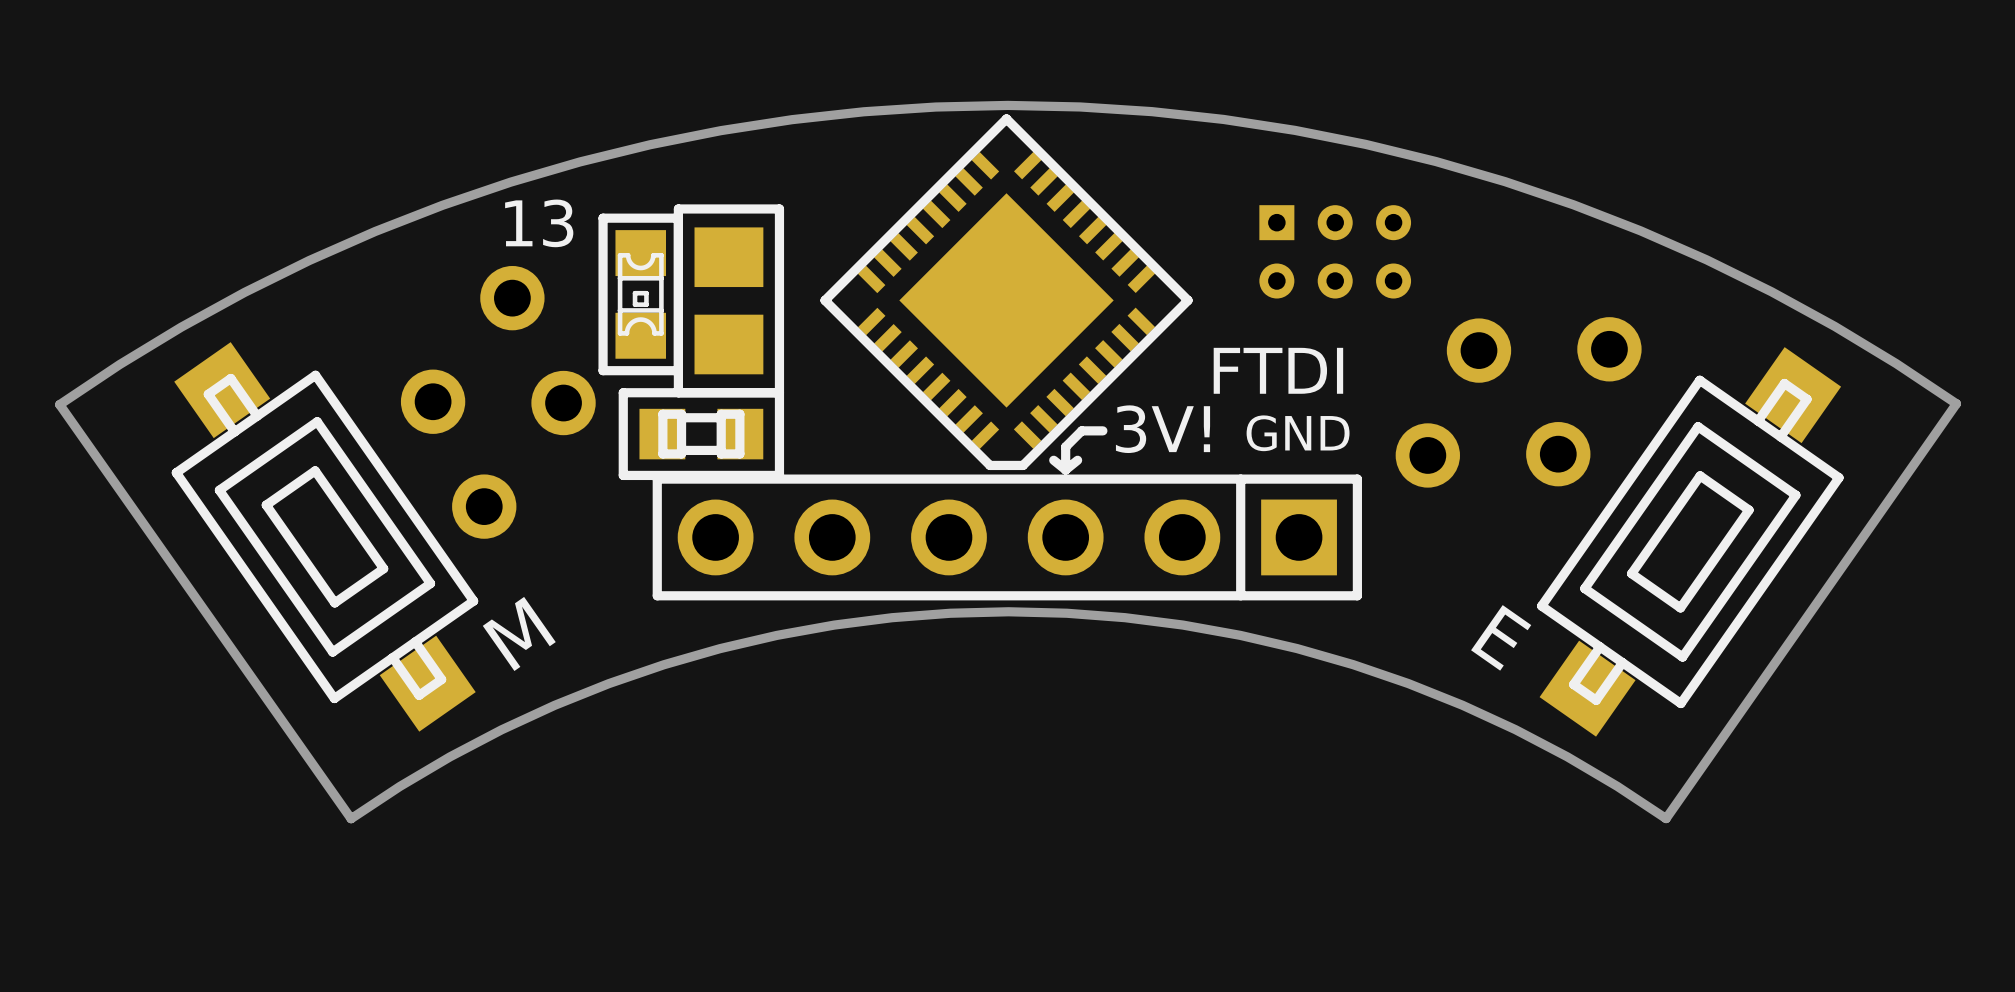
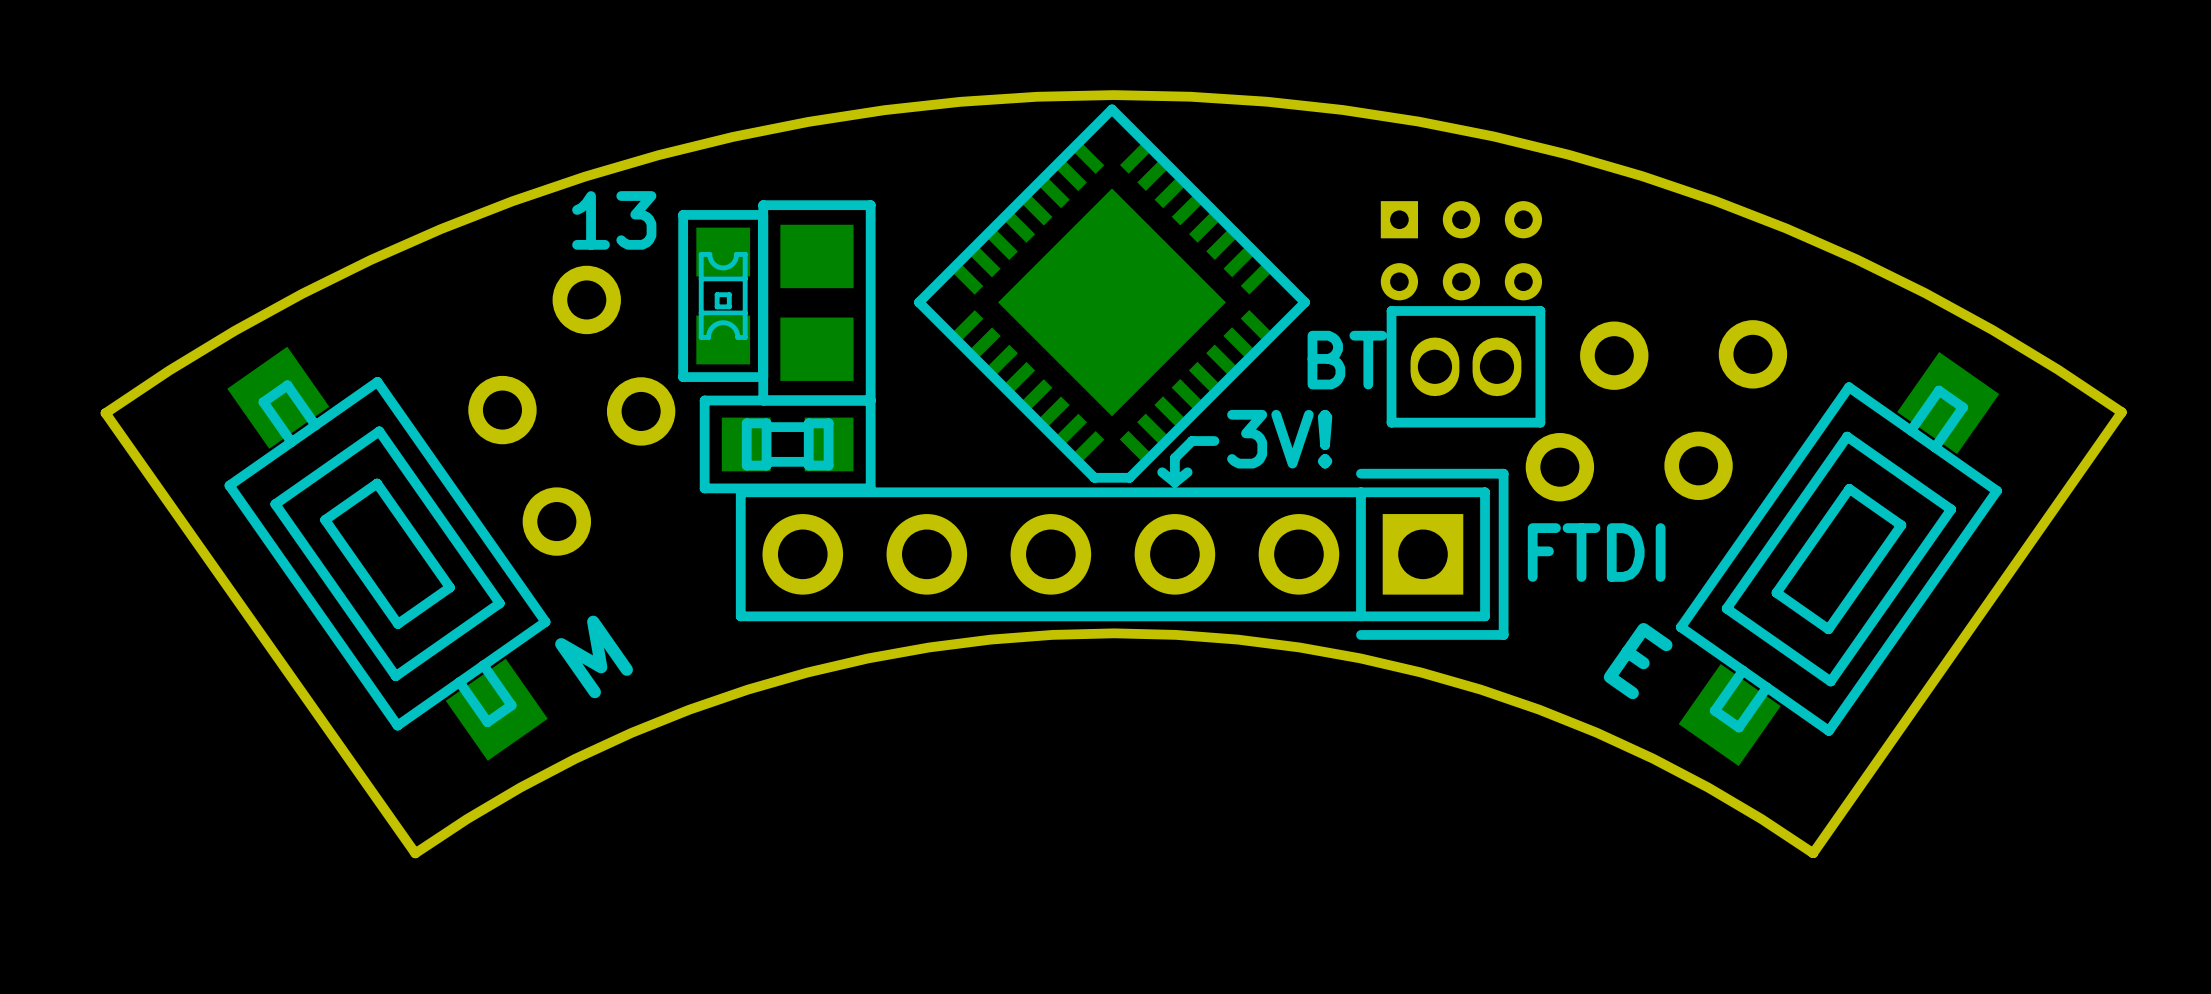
text: none -> BT (1347, 360)
part: none -> (1465, 366)
part value position: FTDI (1278, 370) -> FTDI (1596, 552)
text: GND (1298, 433) -> none
part footprint: [652, 474, 1362, 601] -> [735, 468, 1509, 640]

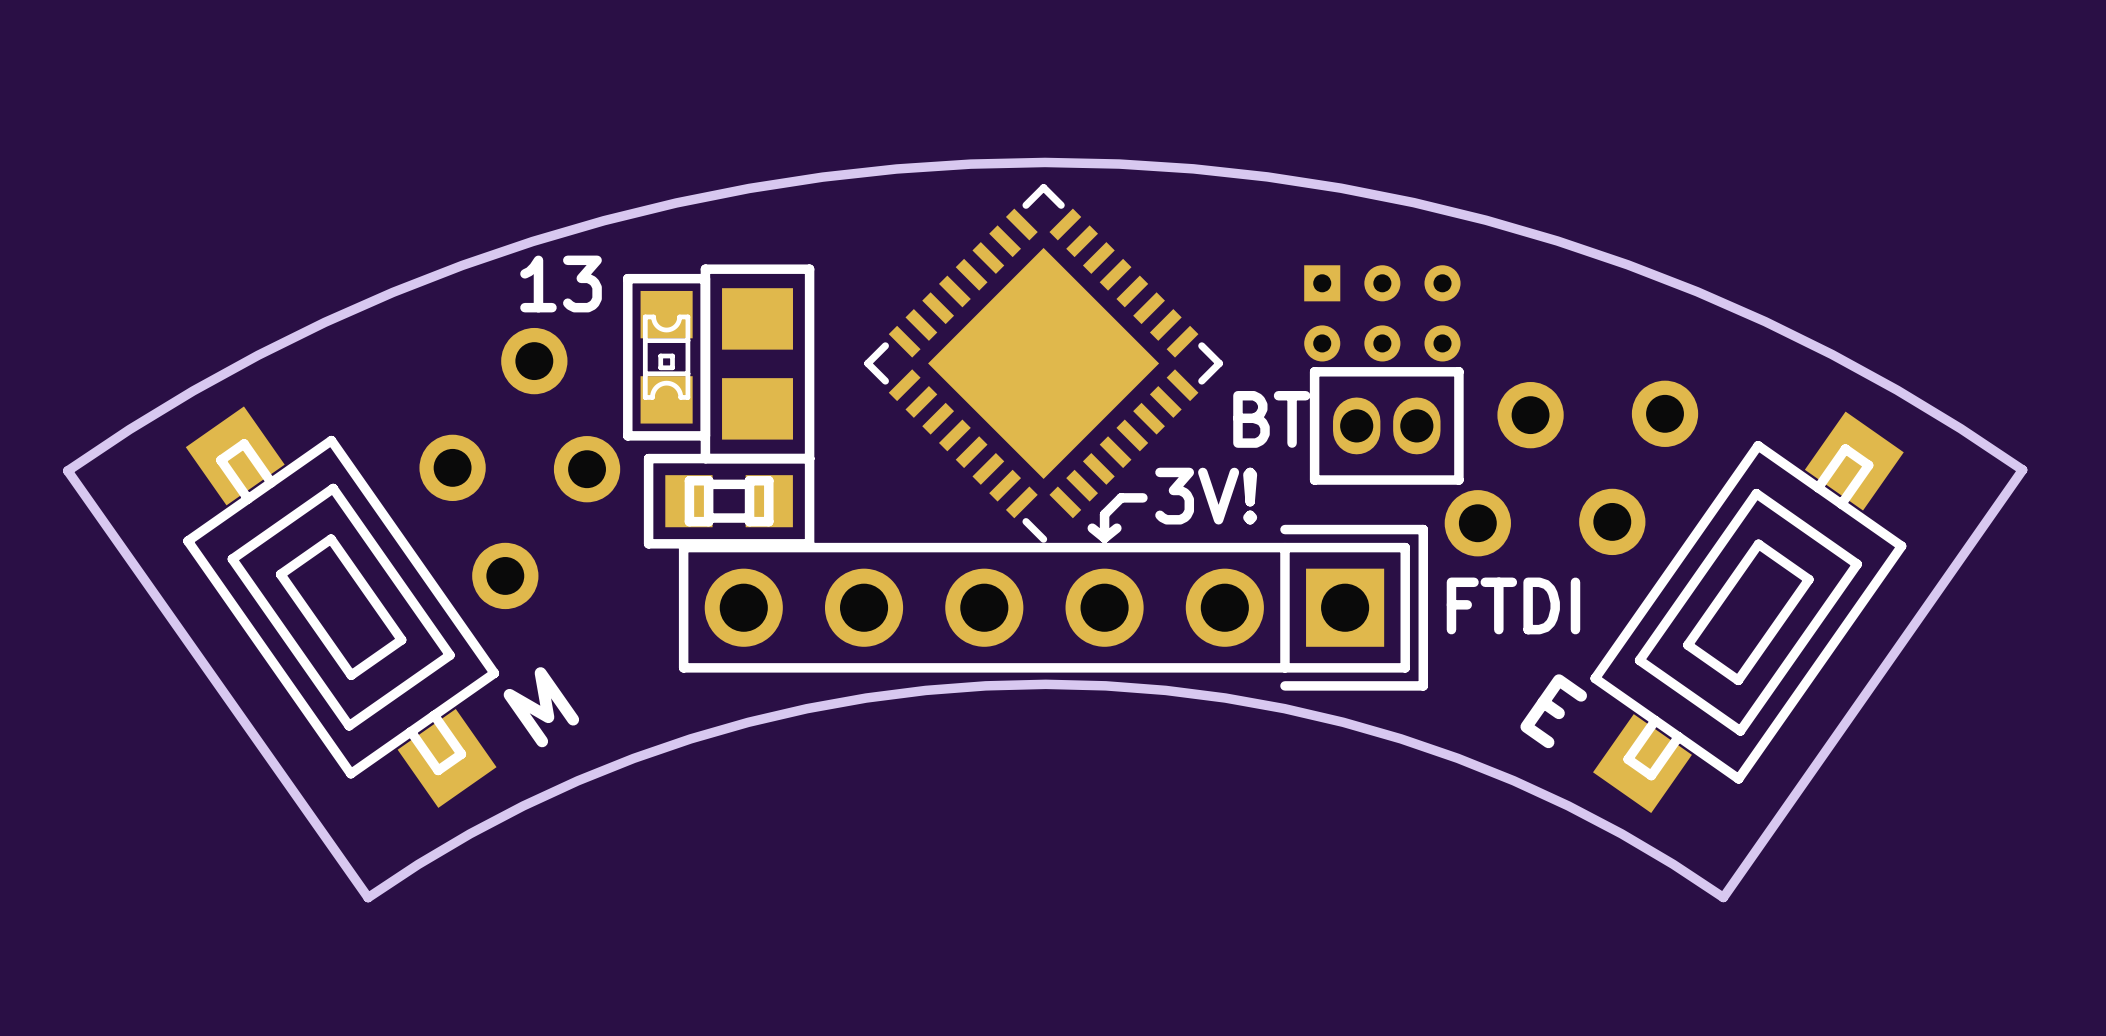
part footprint: [914, 104, 1310, 483] -> [864, 184, 1223, 543]

